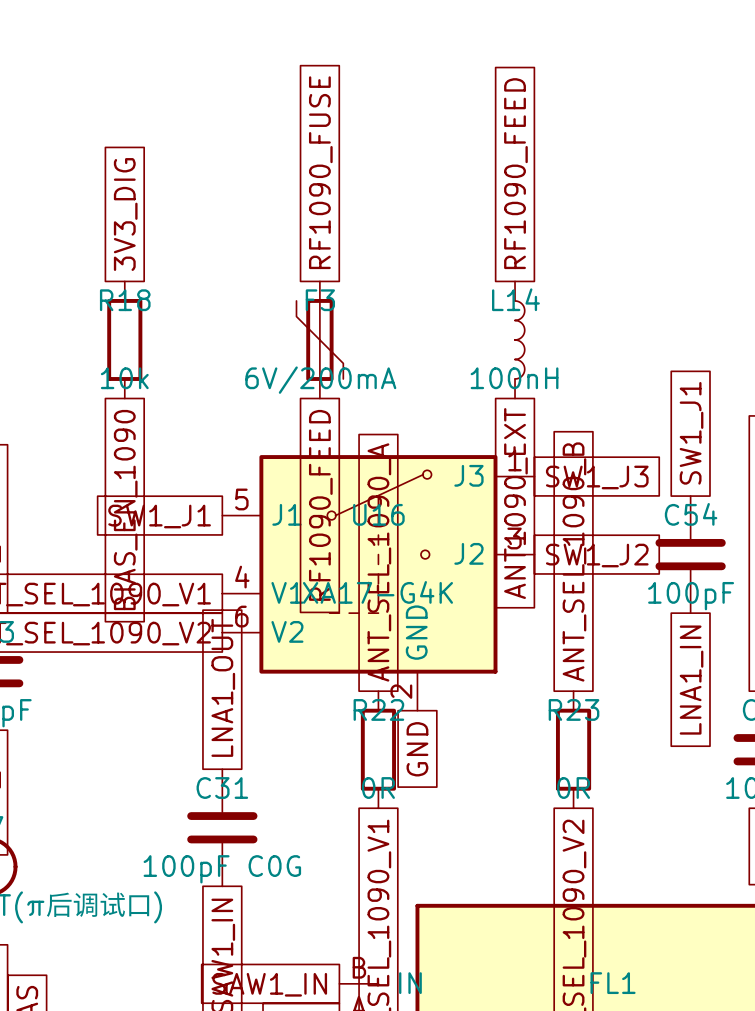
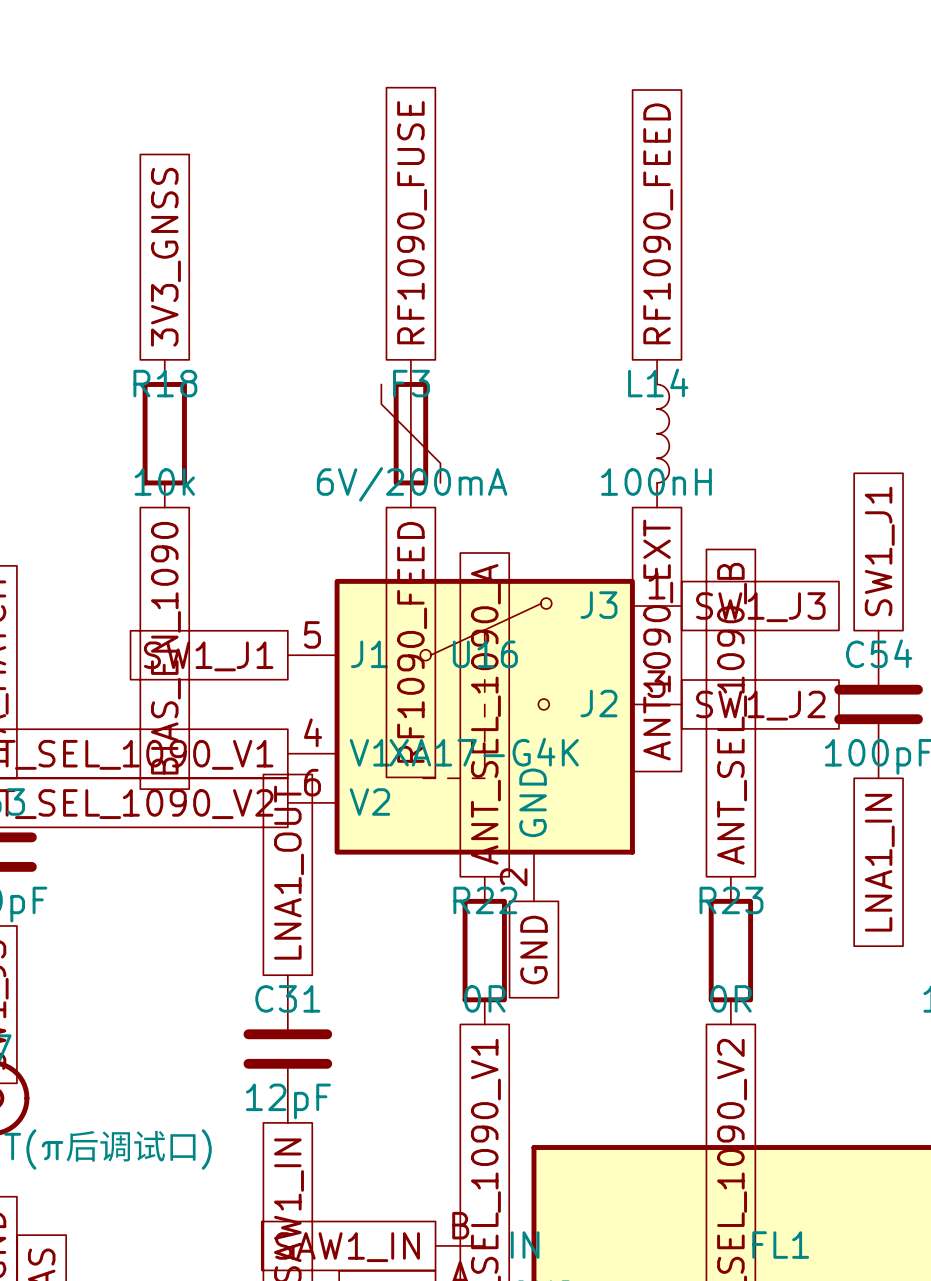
global label: 3V3_DIG (125, 214) -> 3V3_GNSS (165, 257)
C31 value: 100pF C0G (222, 869) -> 12pF (288, 1101)

